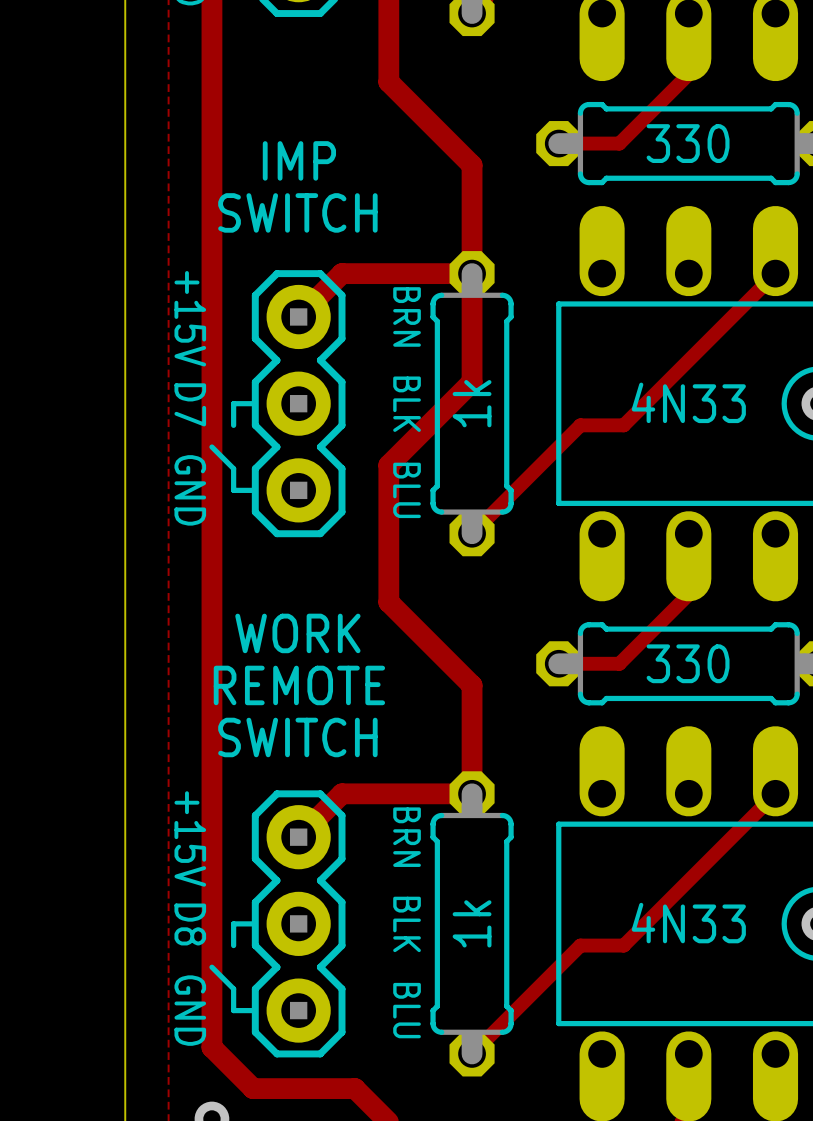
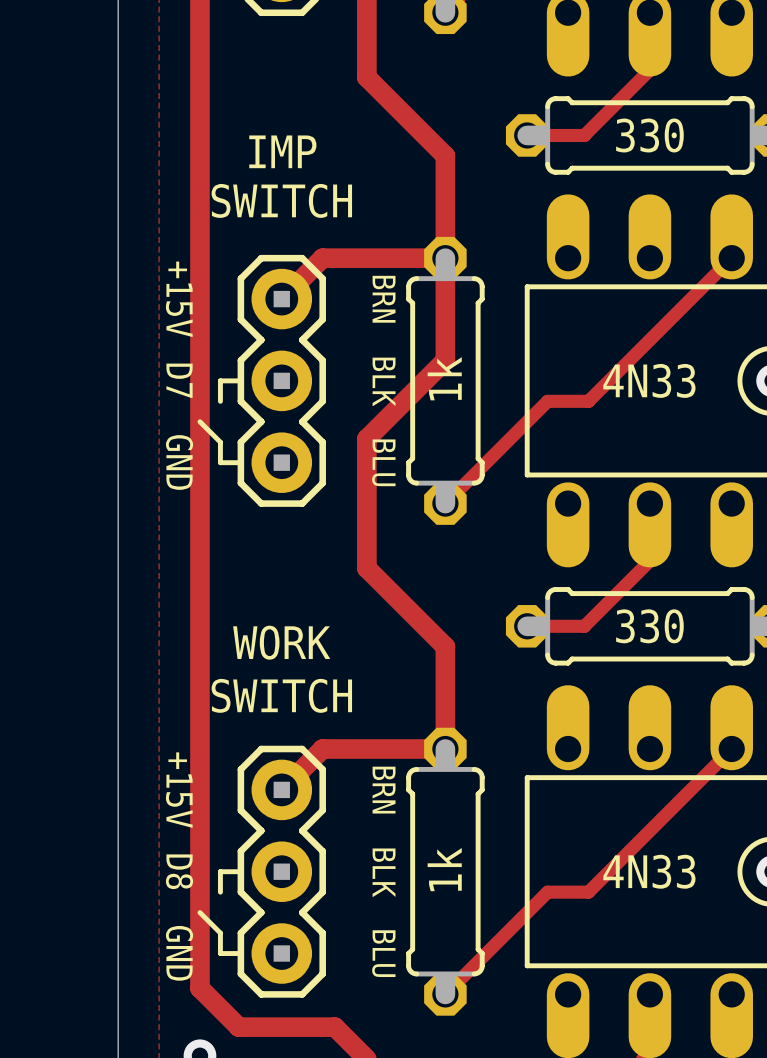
text: WORK (297, 633) -> none
text: REMOTE (299, 685) -> WORK (281, 642)

